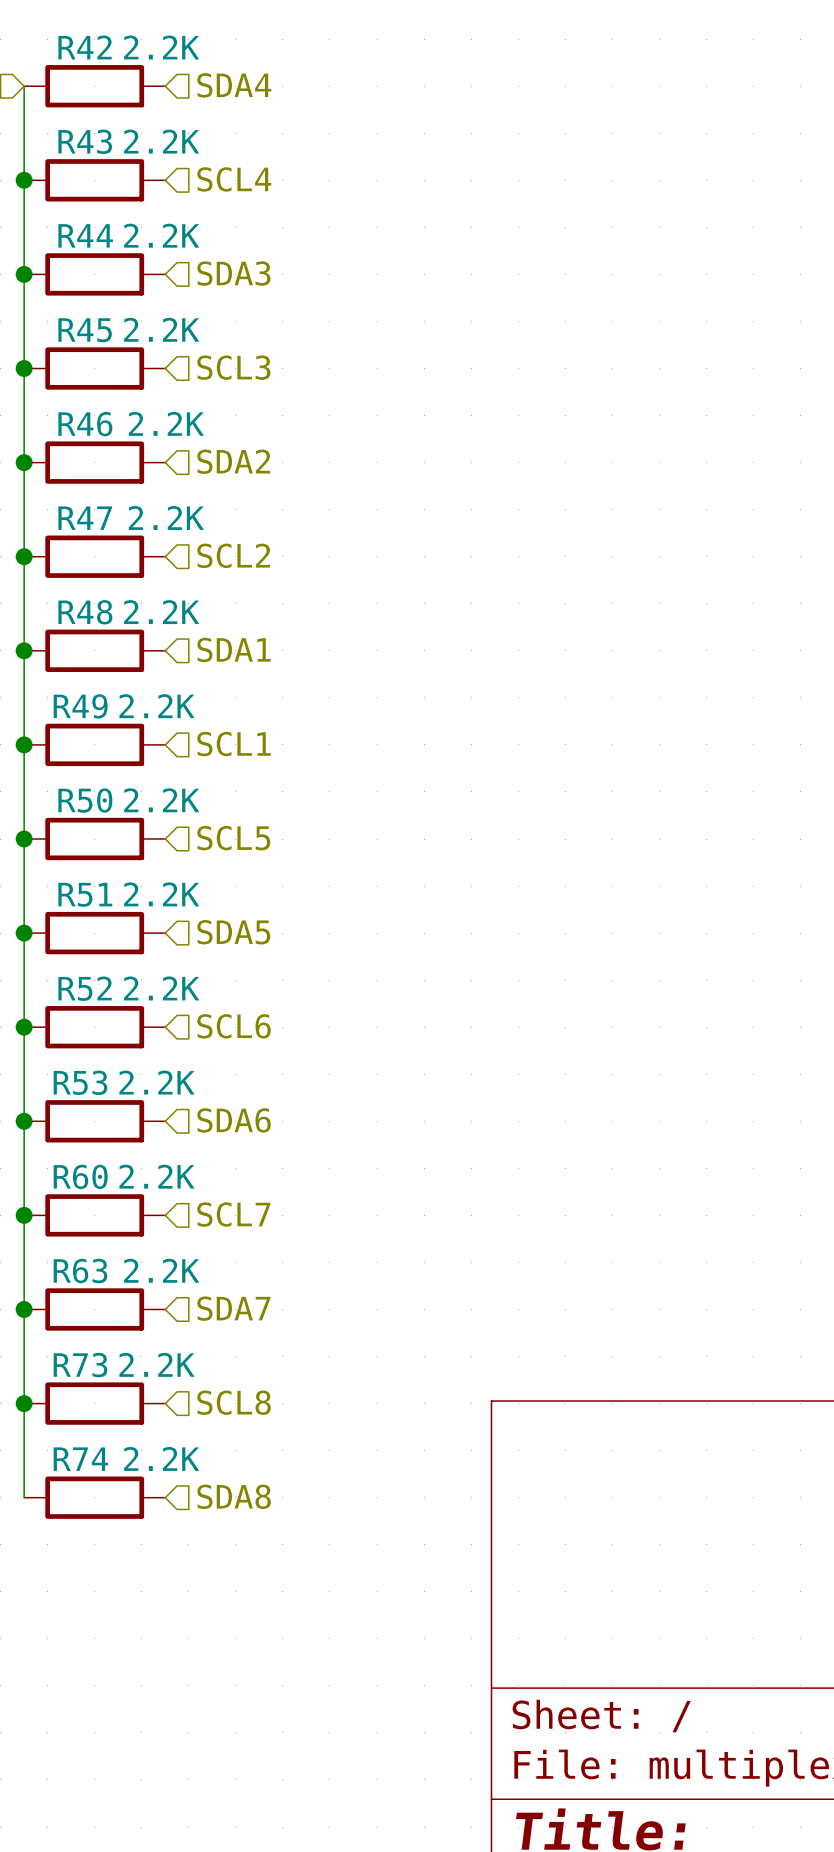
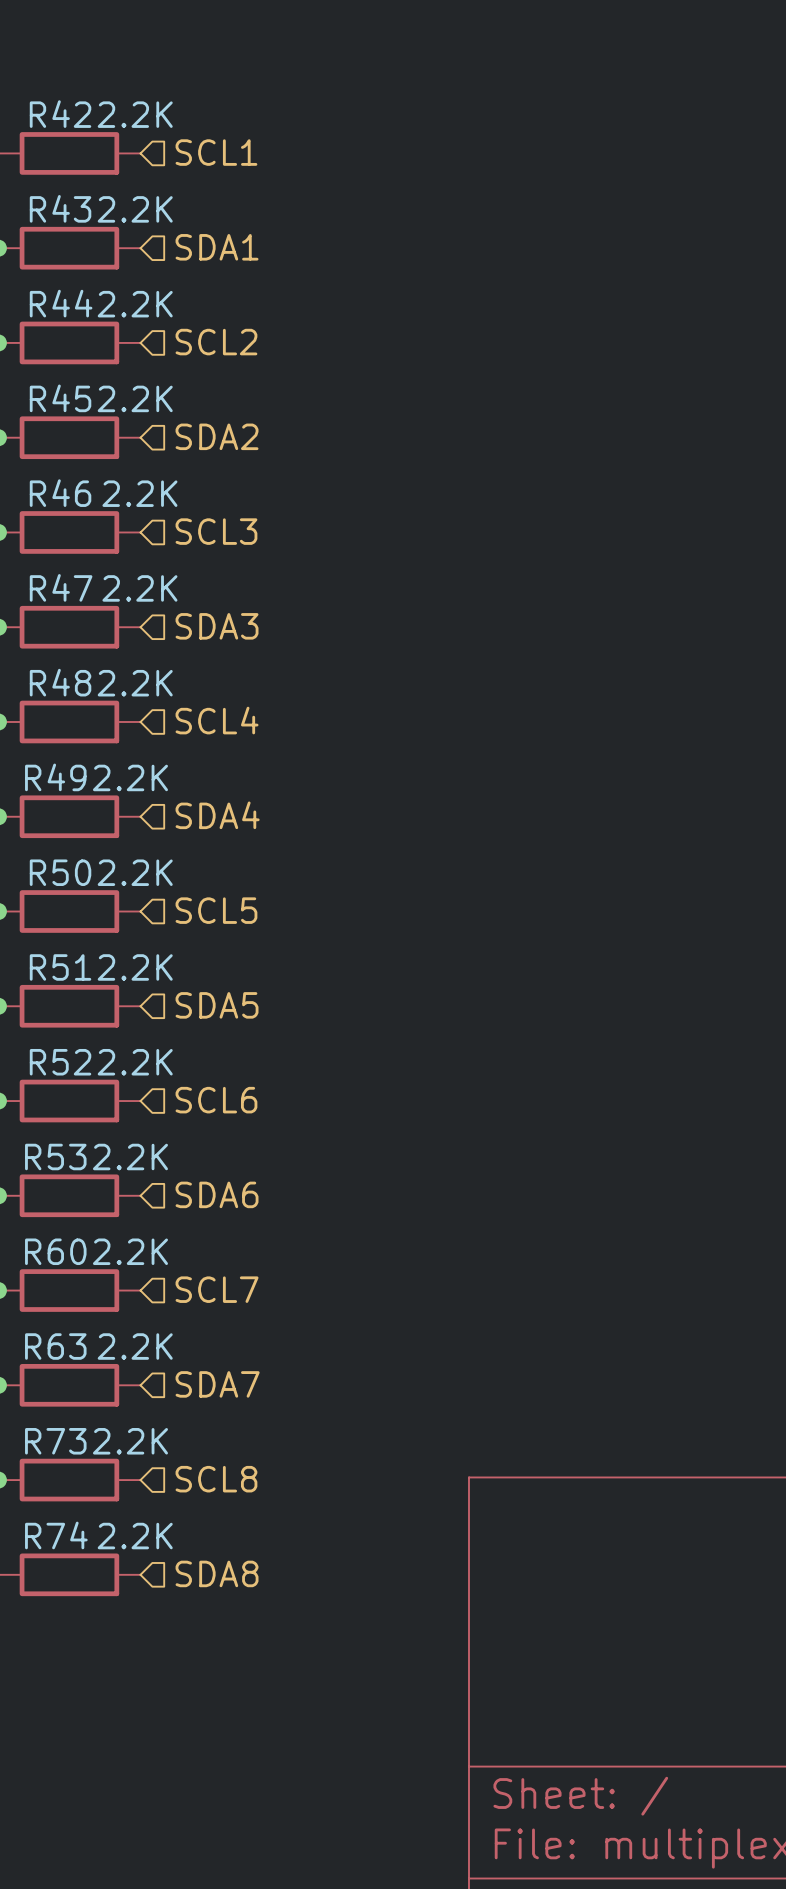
hierarchical label: SDA4 (234, 85) -> SCL1 (216, 152)
hierarchical label: SCL4 (234, 179) -> SDA1 (217, 247)
hierarchical label: SDA3 (233, 273) -> SCL2 (216, 342)
hierarchical label: SCL3 (233, 367) -> SDA2 (217, 436)
hierarchical label: SDA2 (233, 461) -> SCL3 (216, 531)
hierarchical label: SCL2 (233, 555) -> SDA3 (217, 626)
hierarchical label: SDA1 (234, 649) -> SCL4 (217, 720)
hierarchical label: SCL1 (234, 744) -> SDA4 (217, 815)

